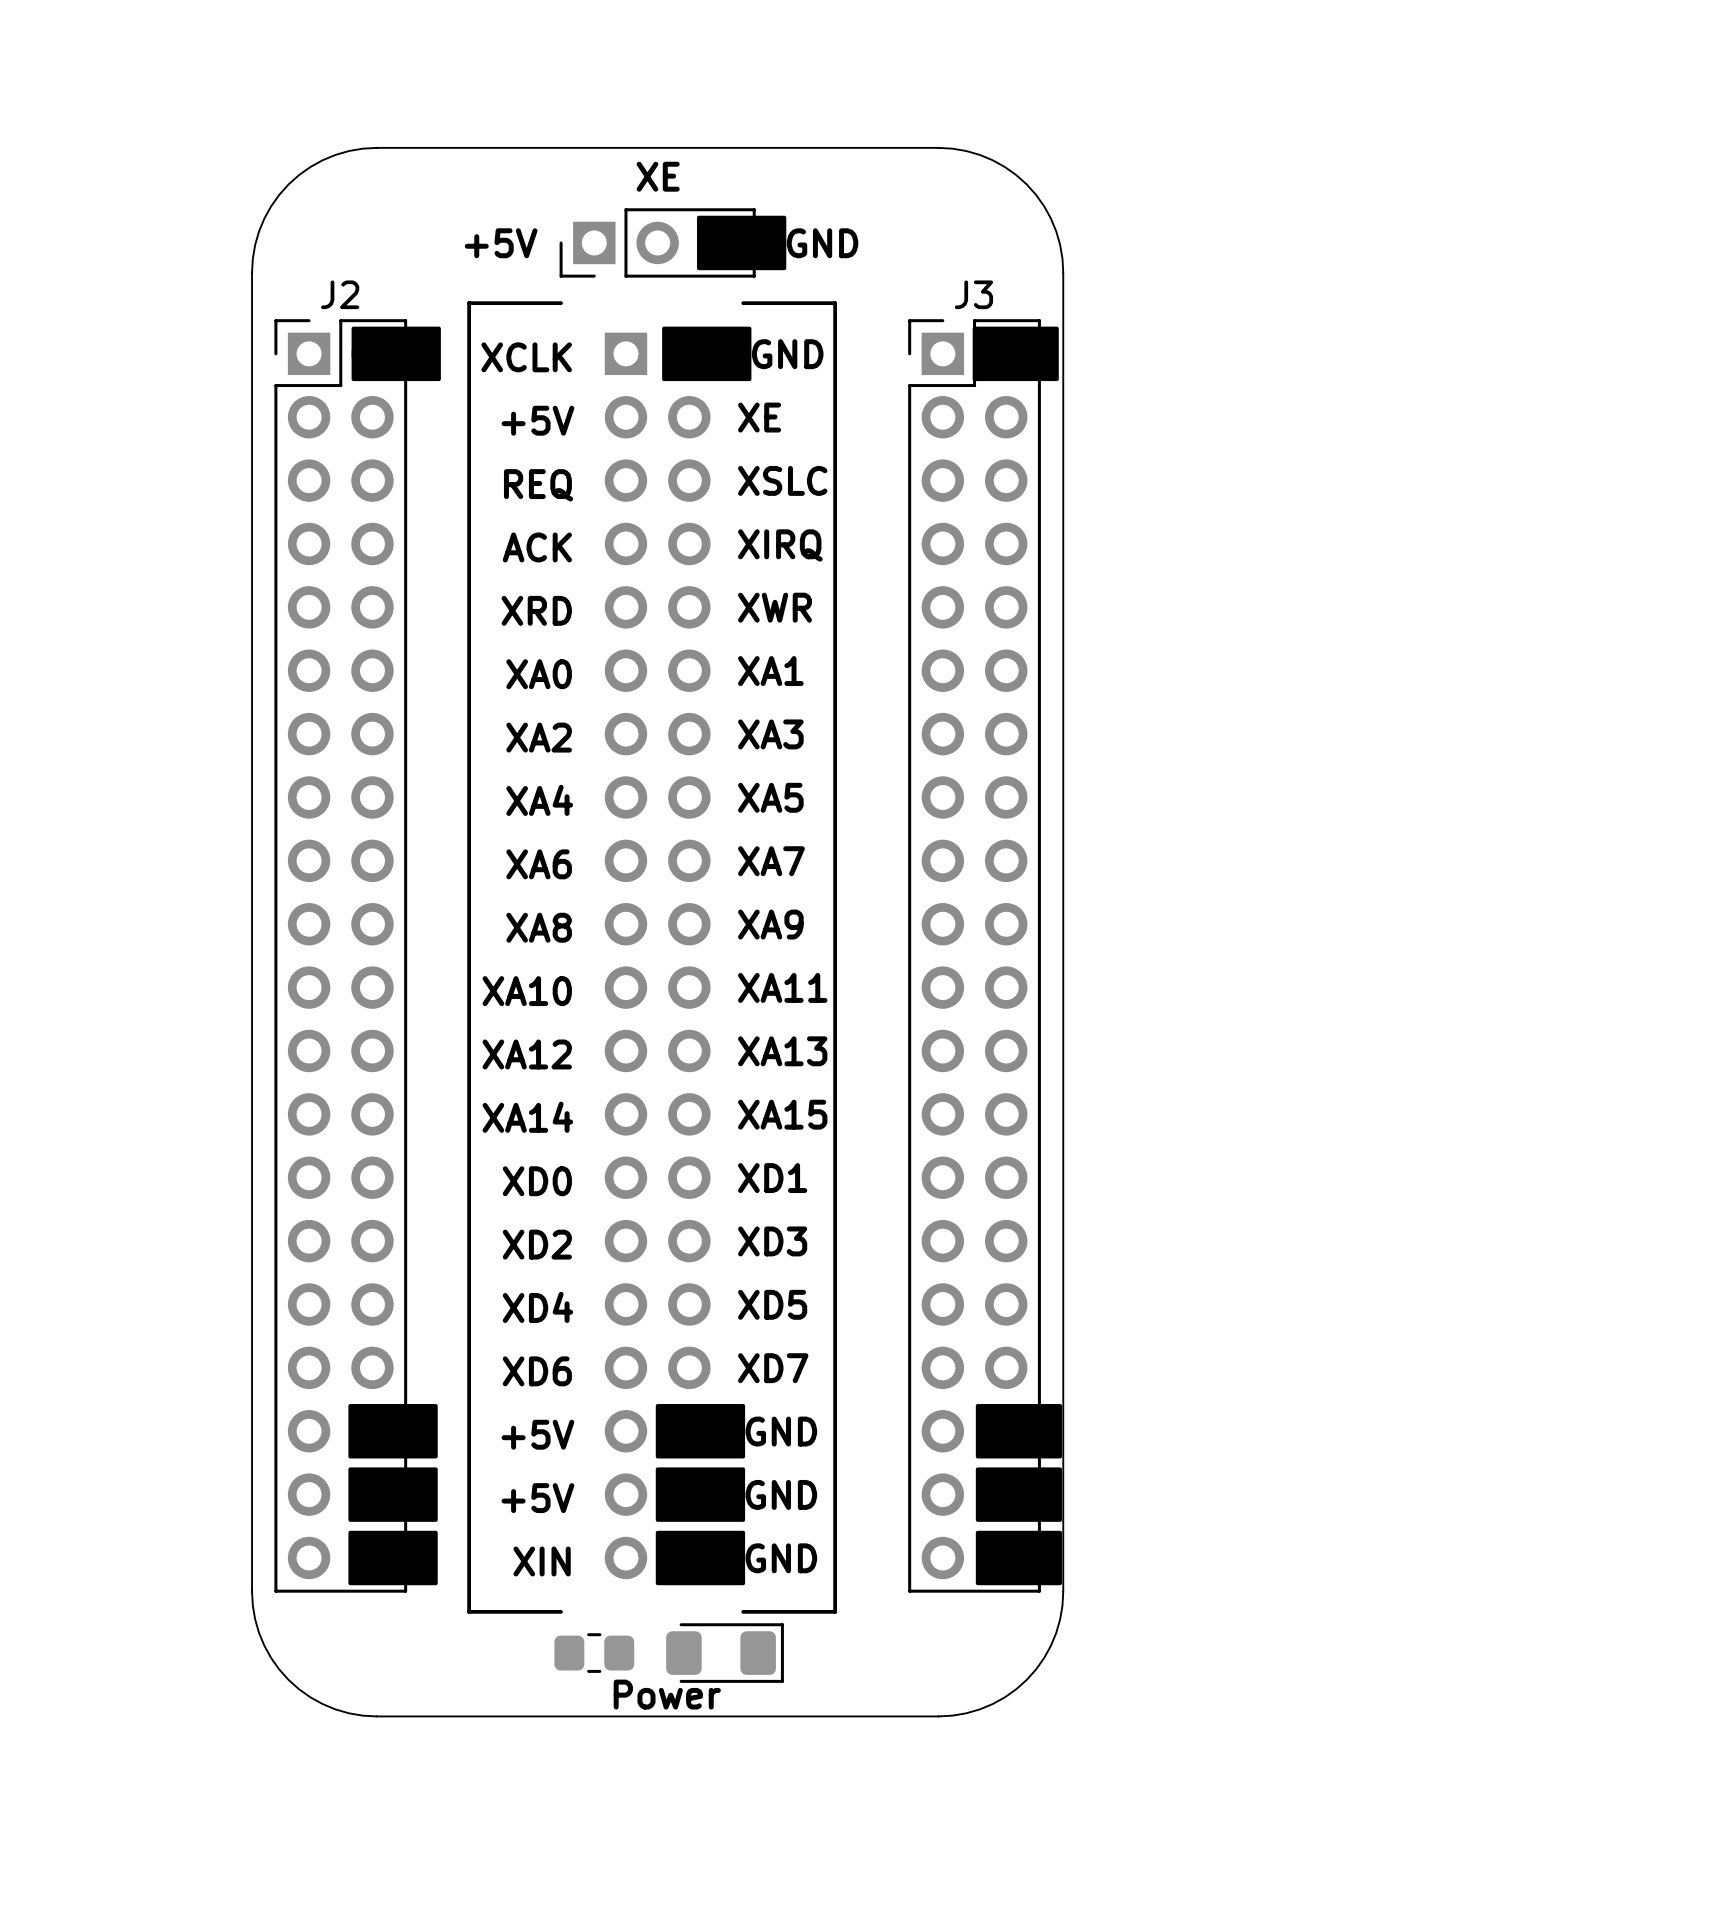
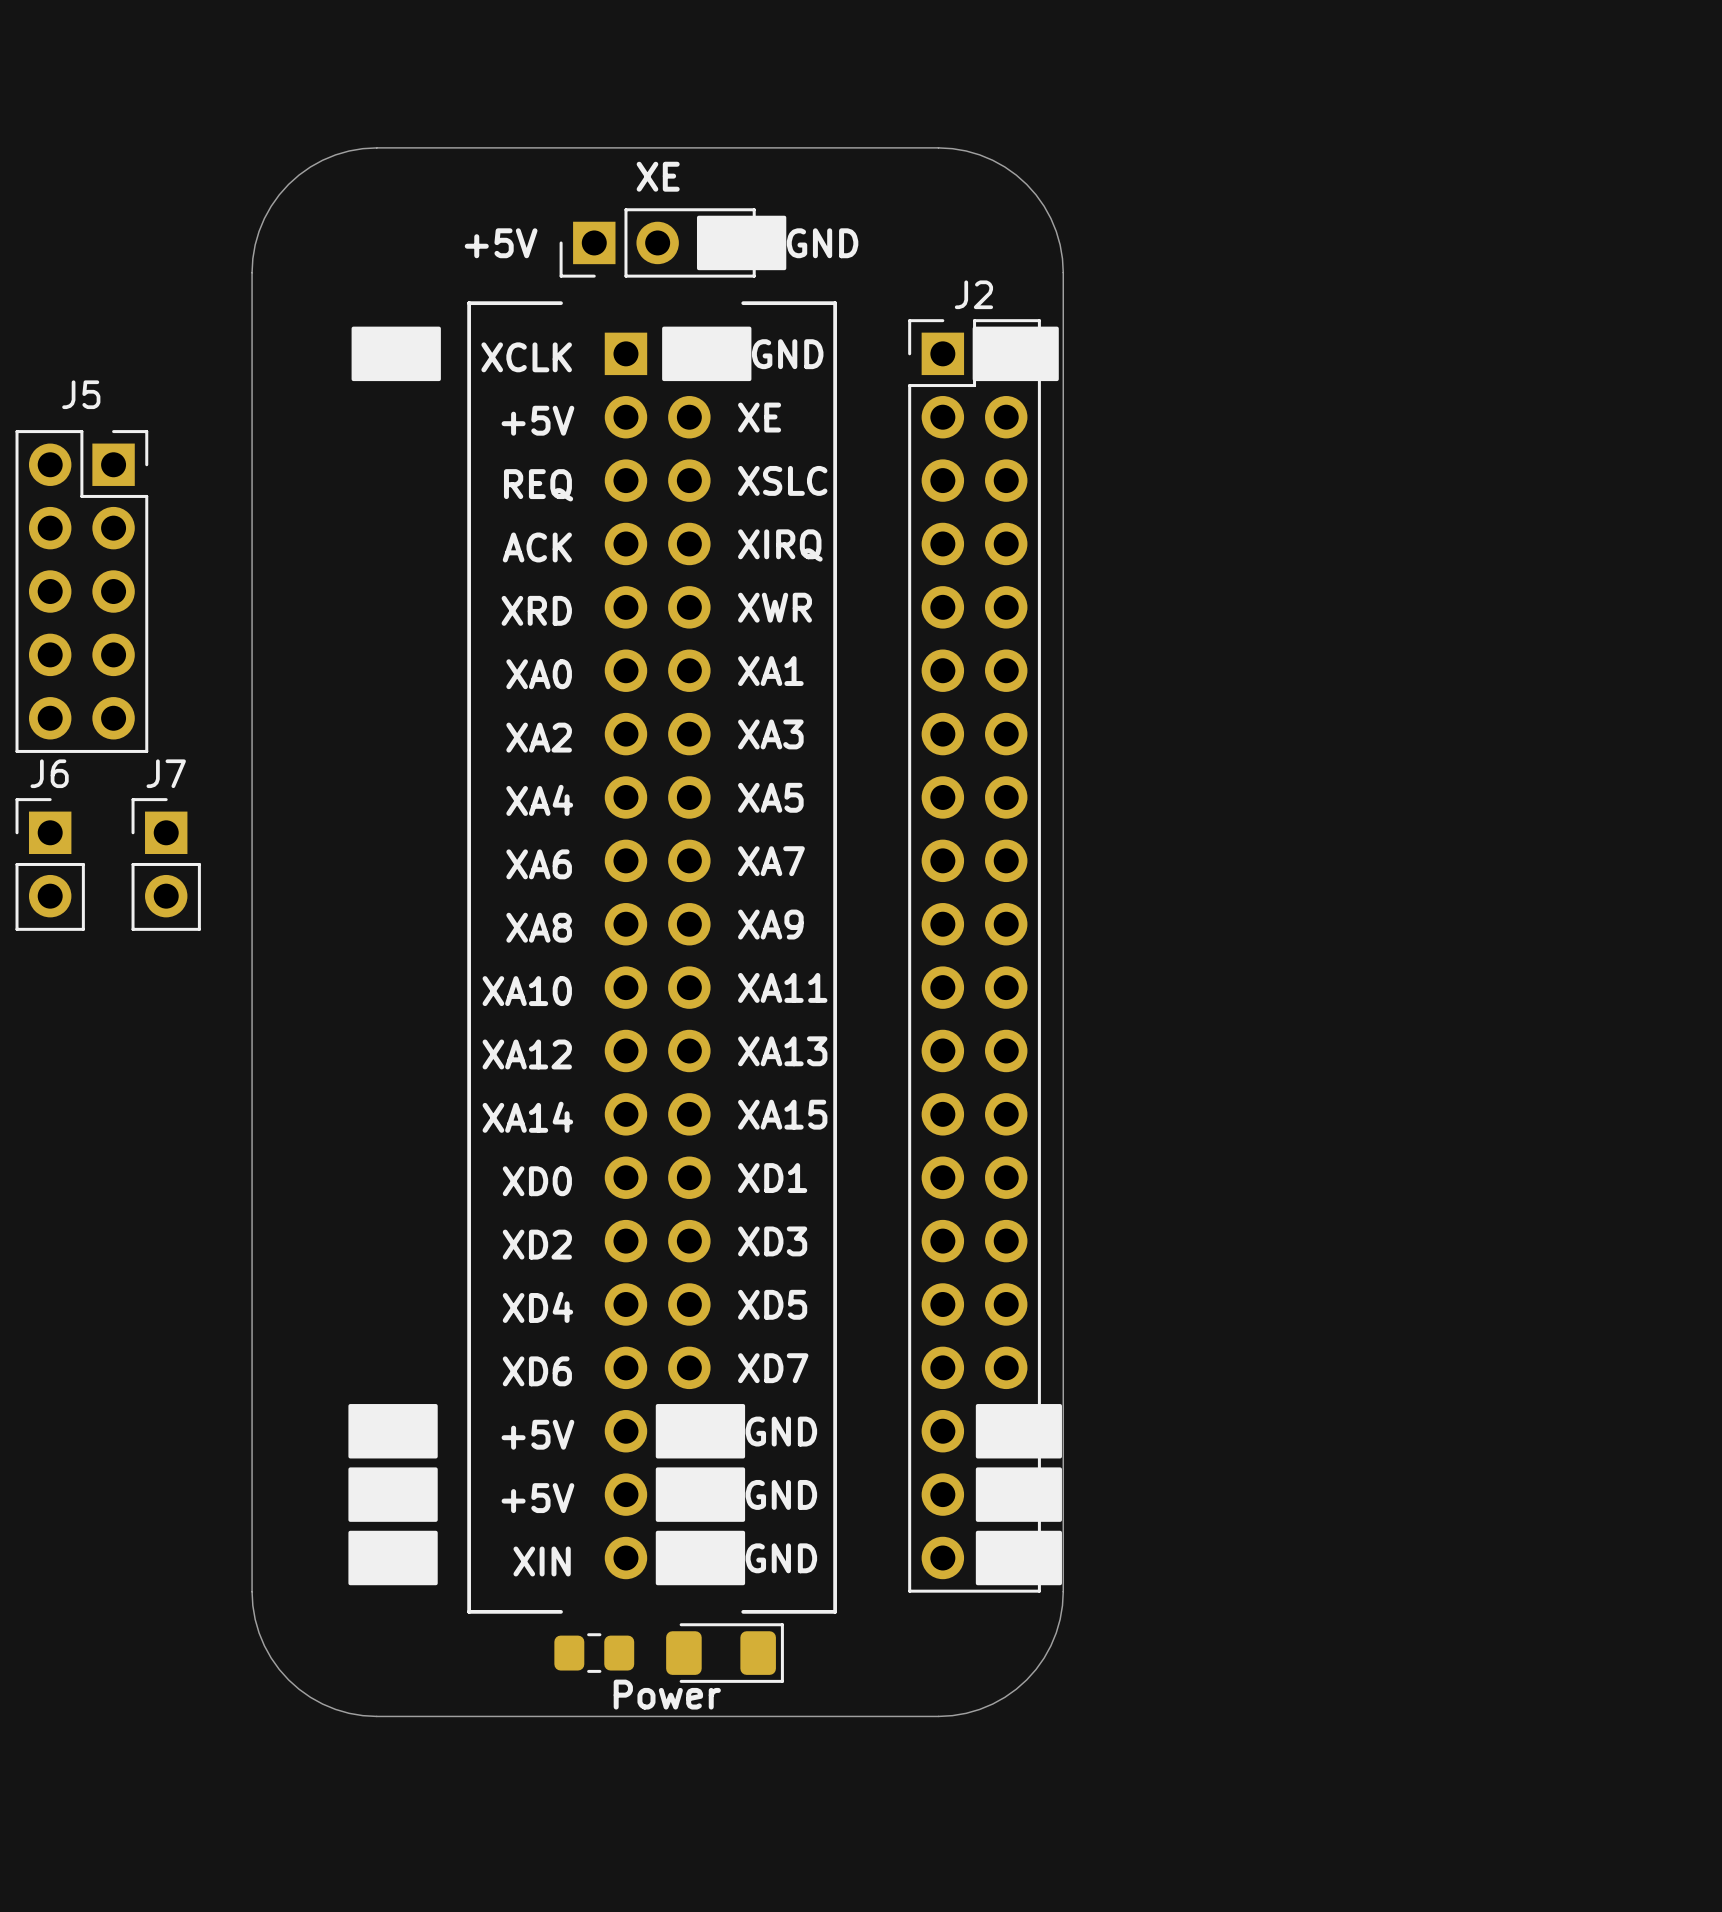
J3 name: J3 (973, 294) -> J2 (973, 294)
J5: none -> (81, 591)
J6: none -> (50, 864)
J7: none -> (166, 864)
J2: (340, 955) -> none

